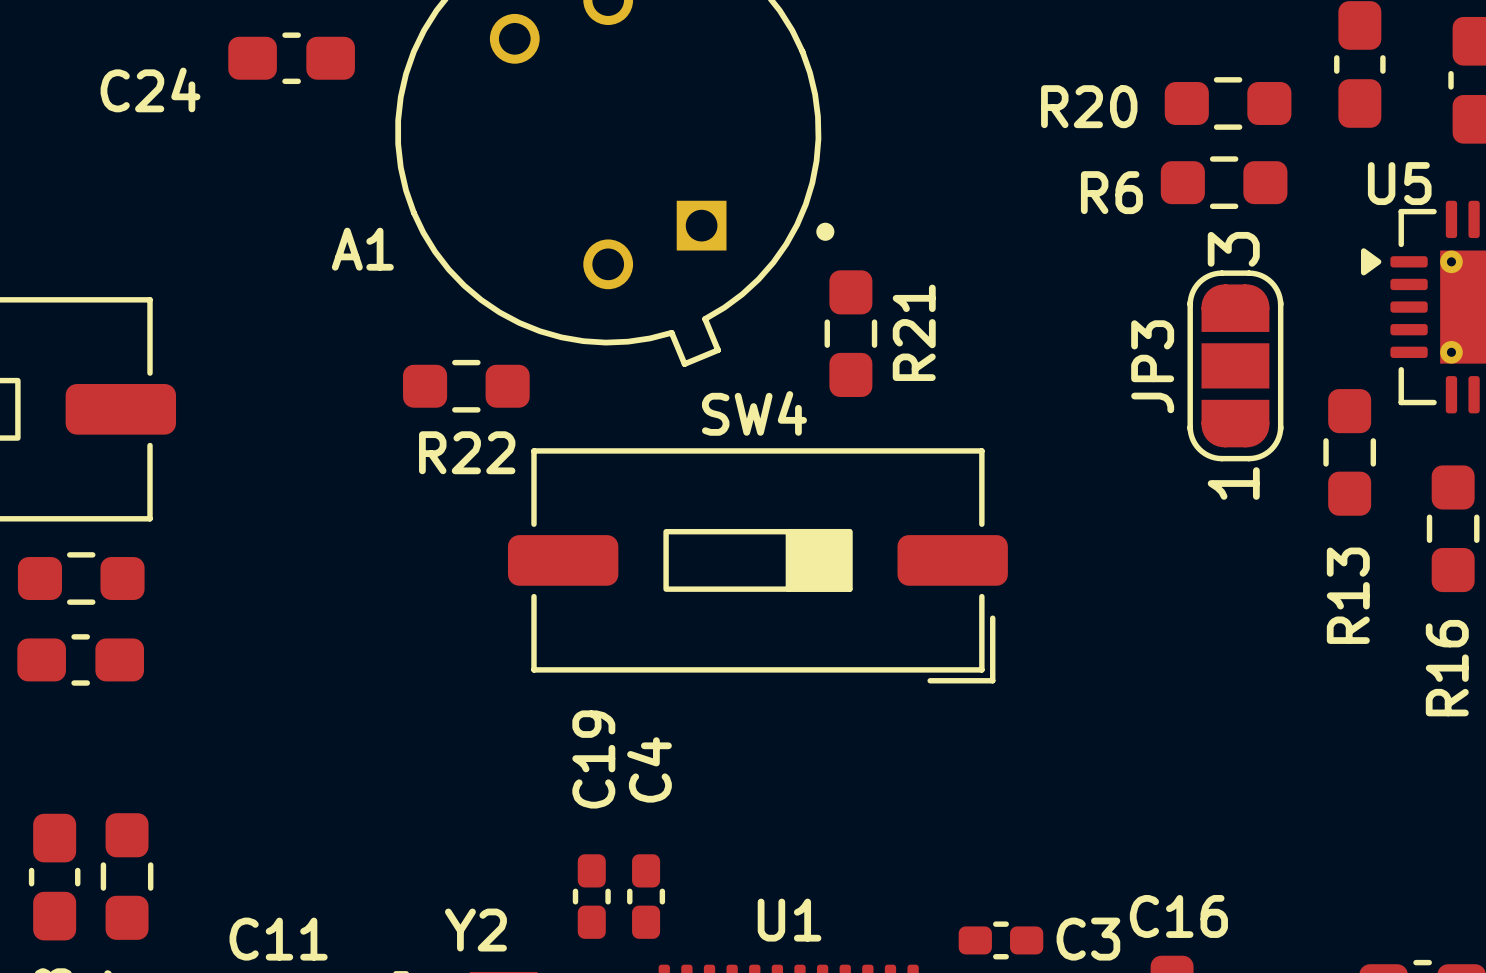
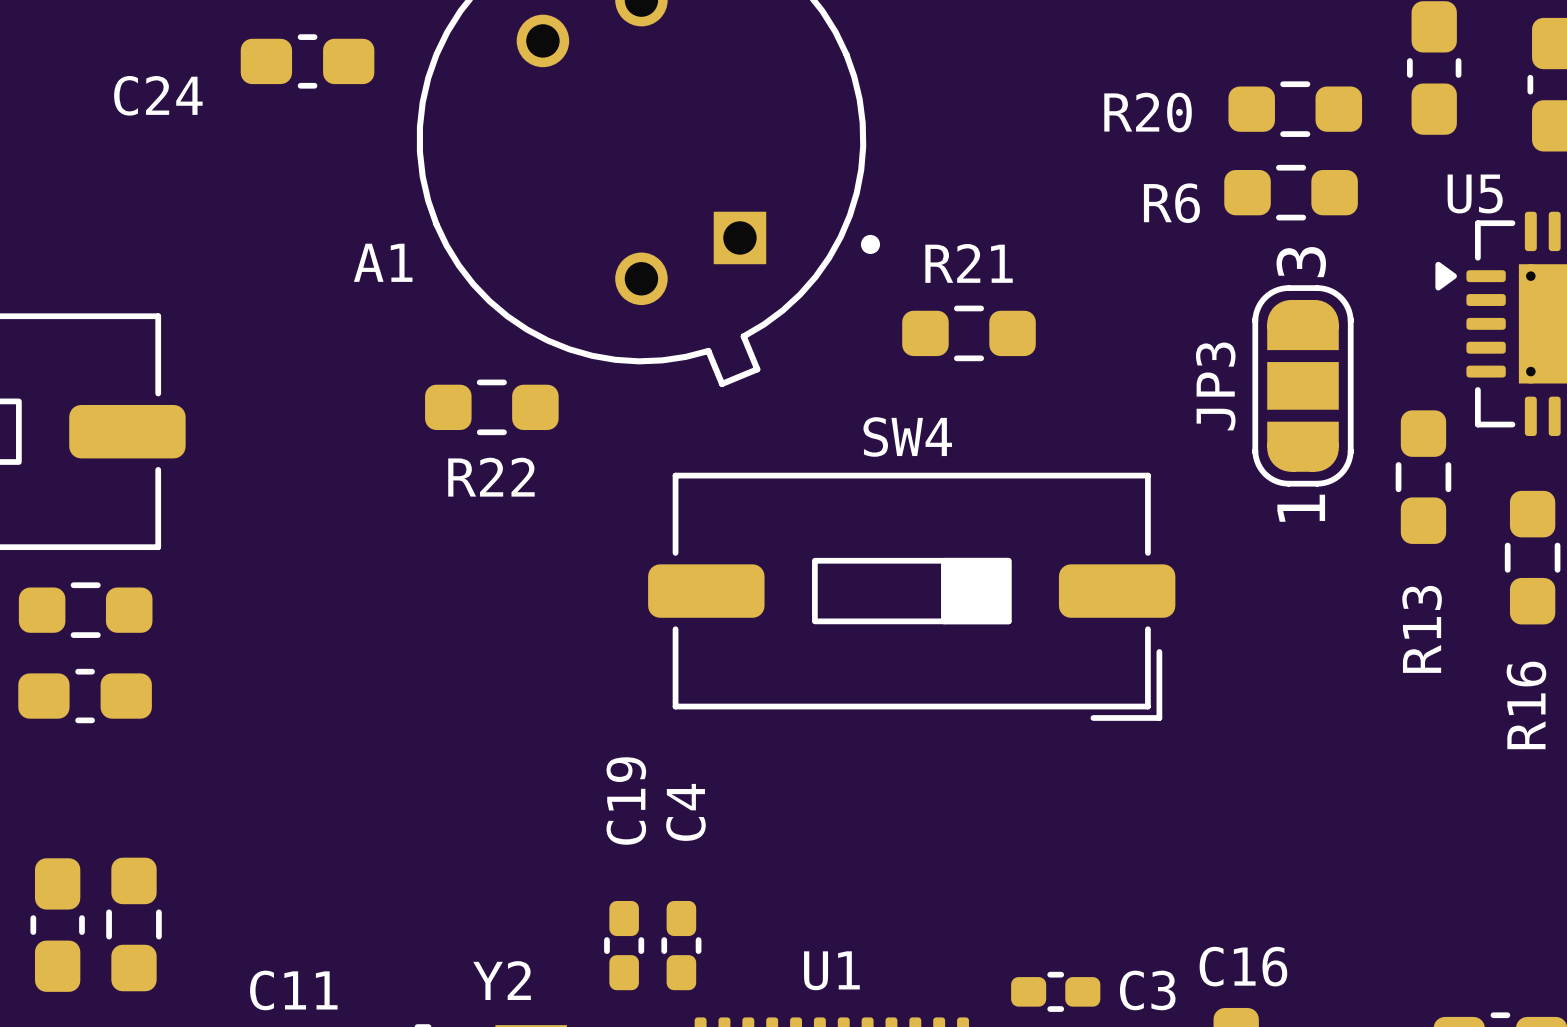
R21 name position: R21 (914, 332) -> R21 (969, 263)
R21 rotation: 0° (850, 333) -> 90° clockwise (969, 333)
SW4 position: (757, 565) -> (911, 596)

